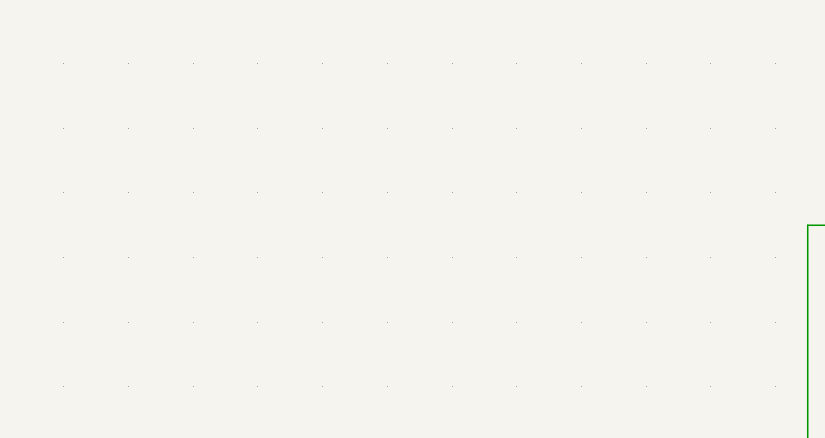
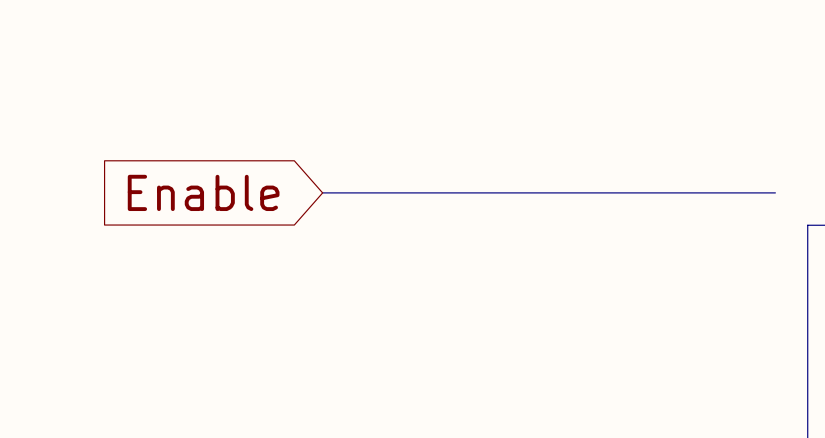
global label: none -> Enable (203, 192)
wire: none -> (322, 192) (775, 192)

